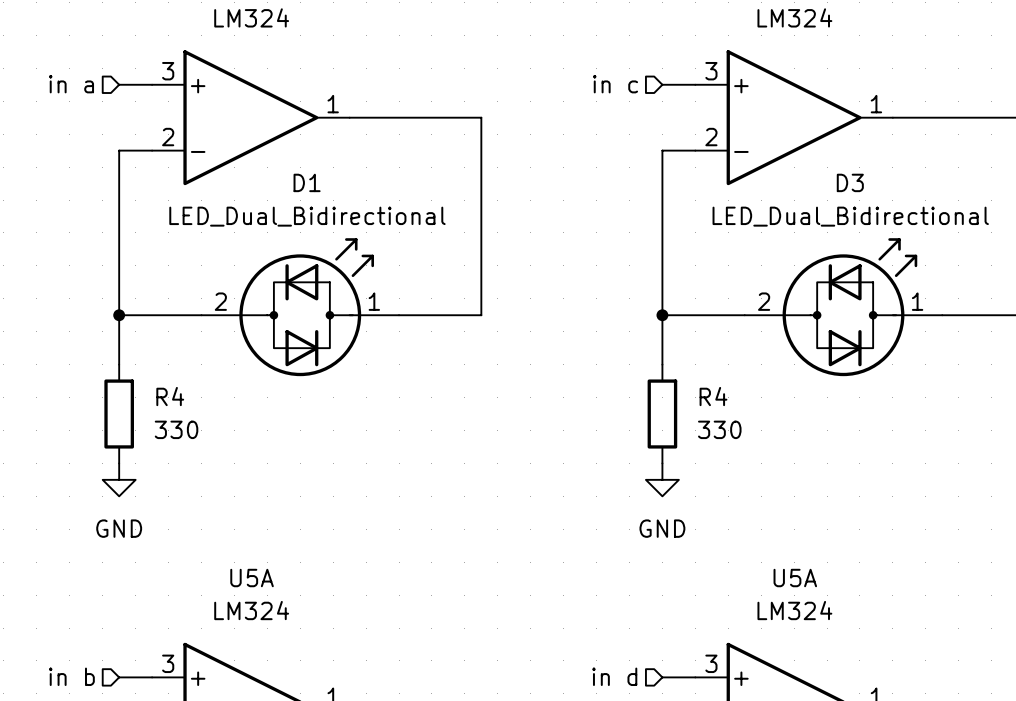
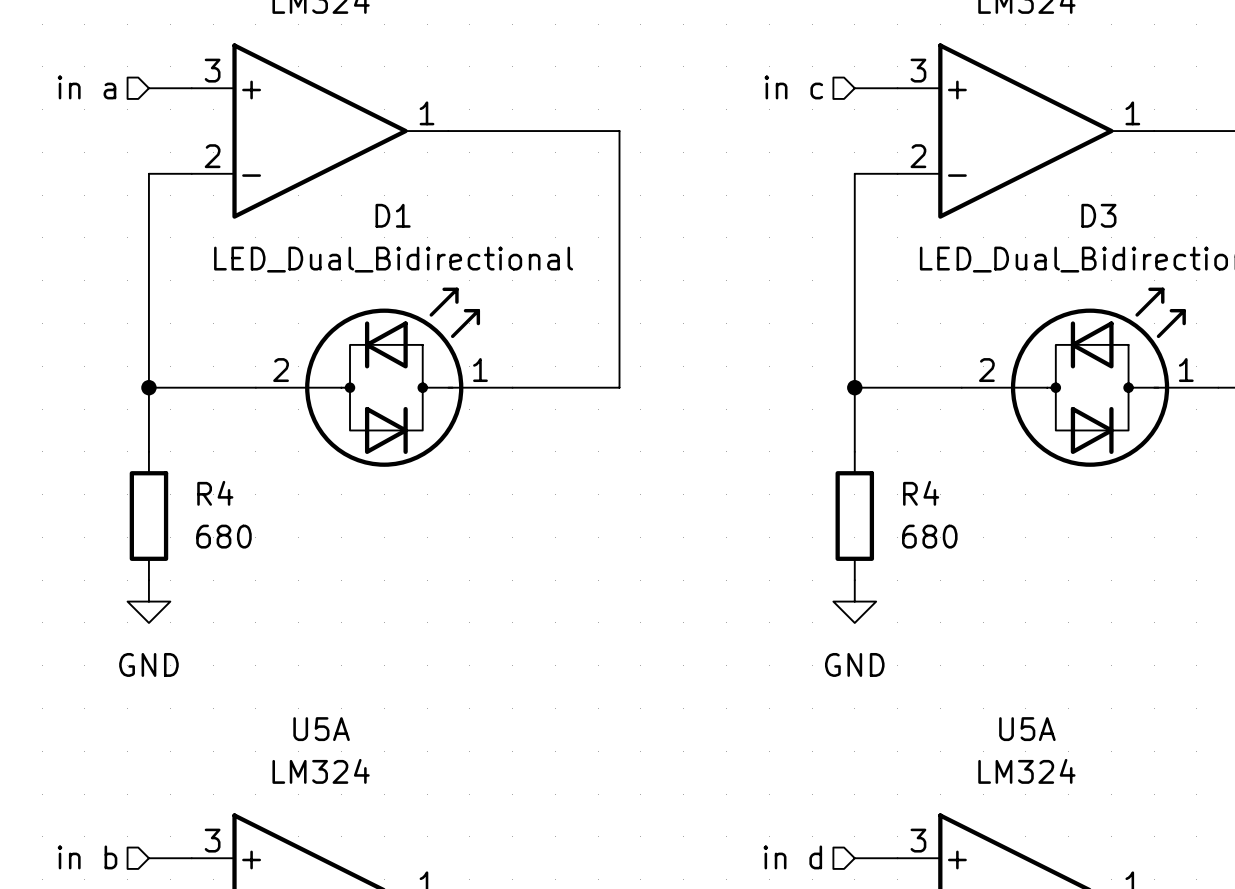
R4 value: 330 (176, 429) -> 680 (223, 536)
R4 value: 330 (719, 429) -> 680 (929, 536)

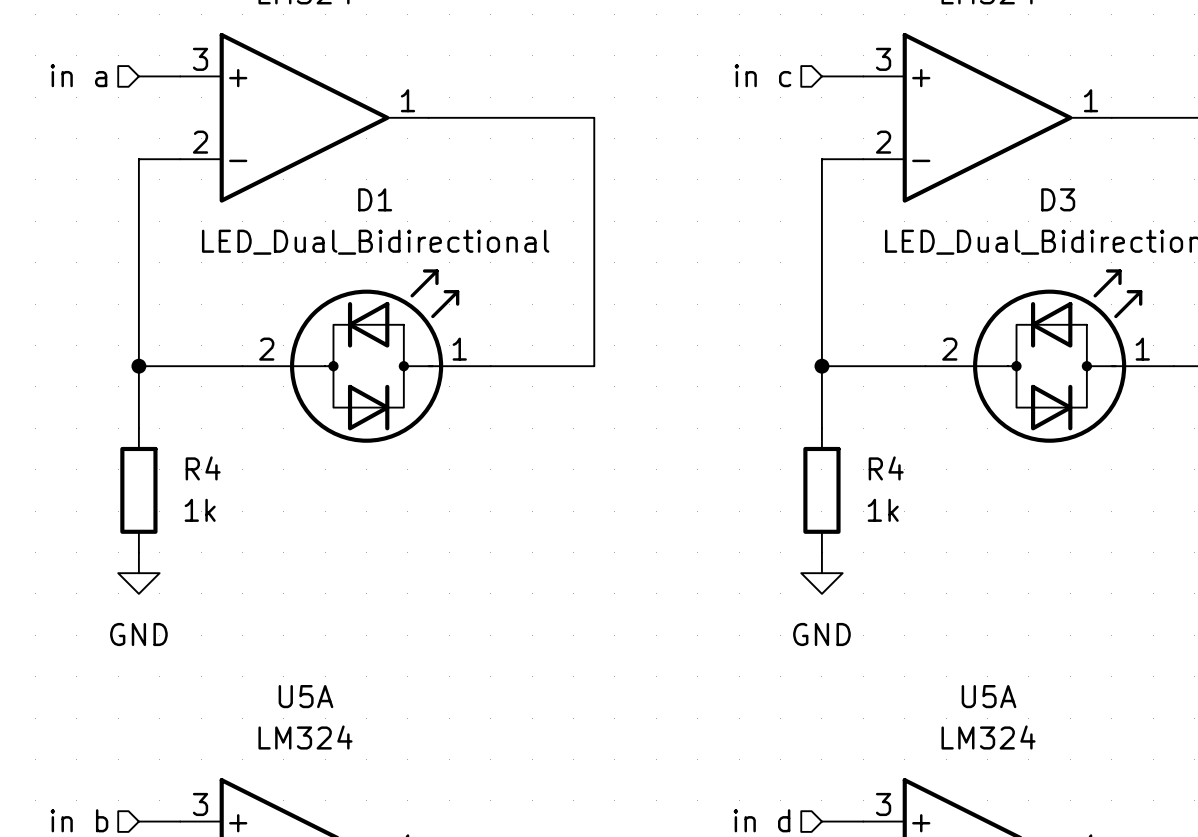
R4 value: 680 (223, 536) -> 1k (200, 510)
R4 value: 680 (929, 536) -> 1k (883, 510)

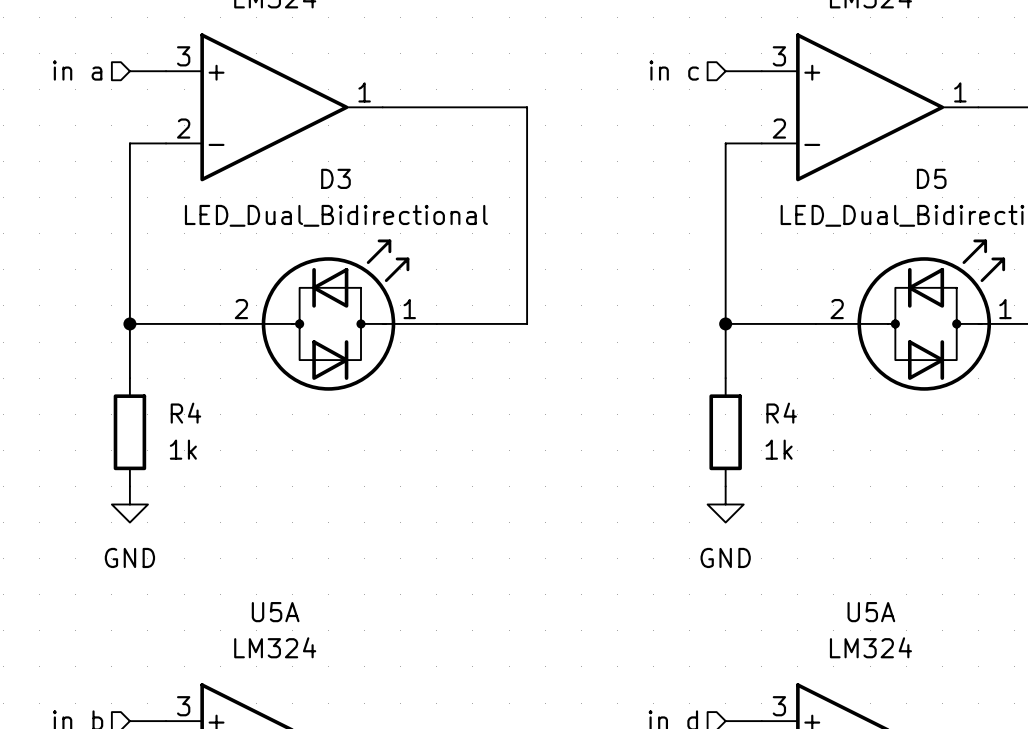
D1 name: D1 (375, 199) -> D3 (335, 178)
D3 name: D3 (1058, 199) -> D5 (931, 178)

